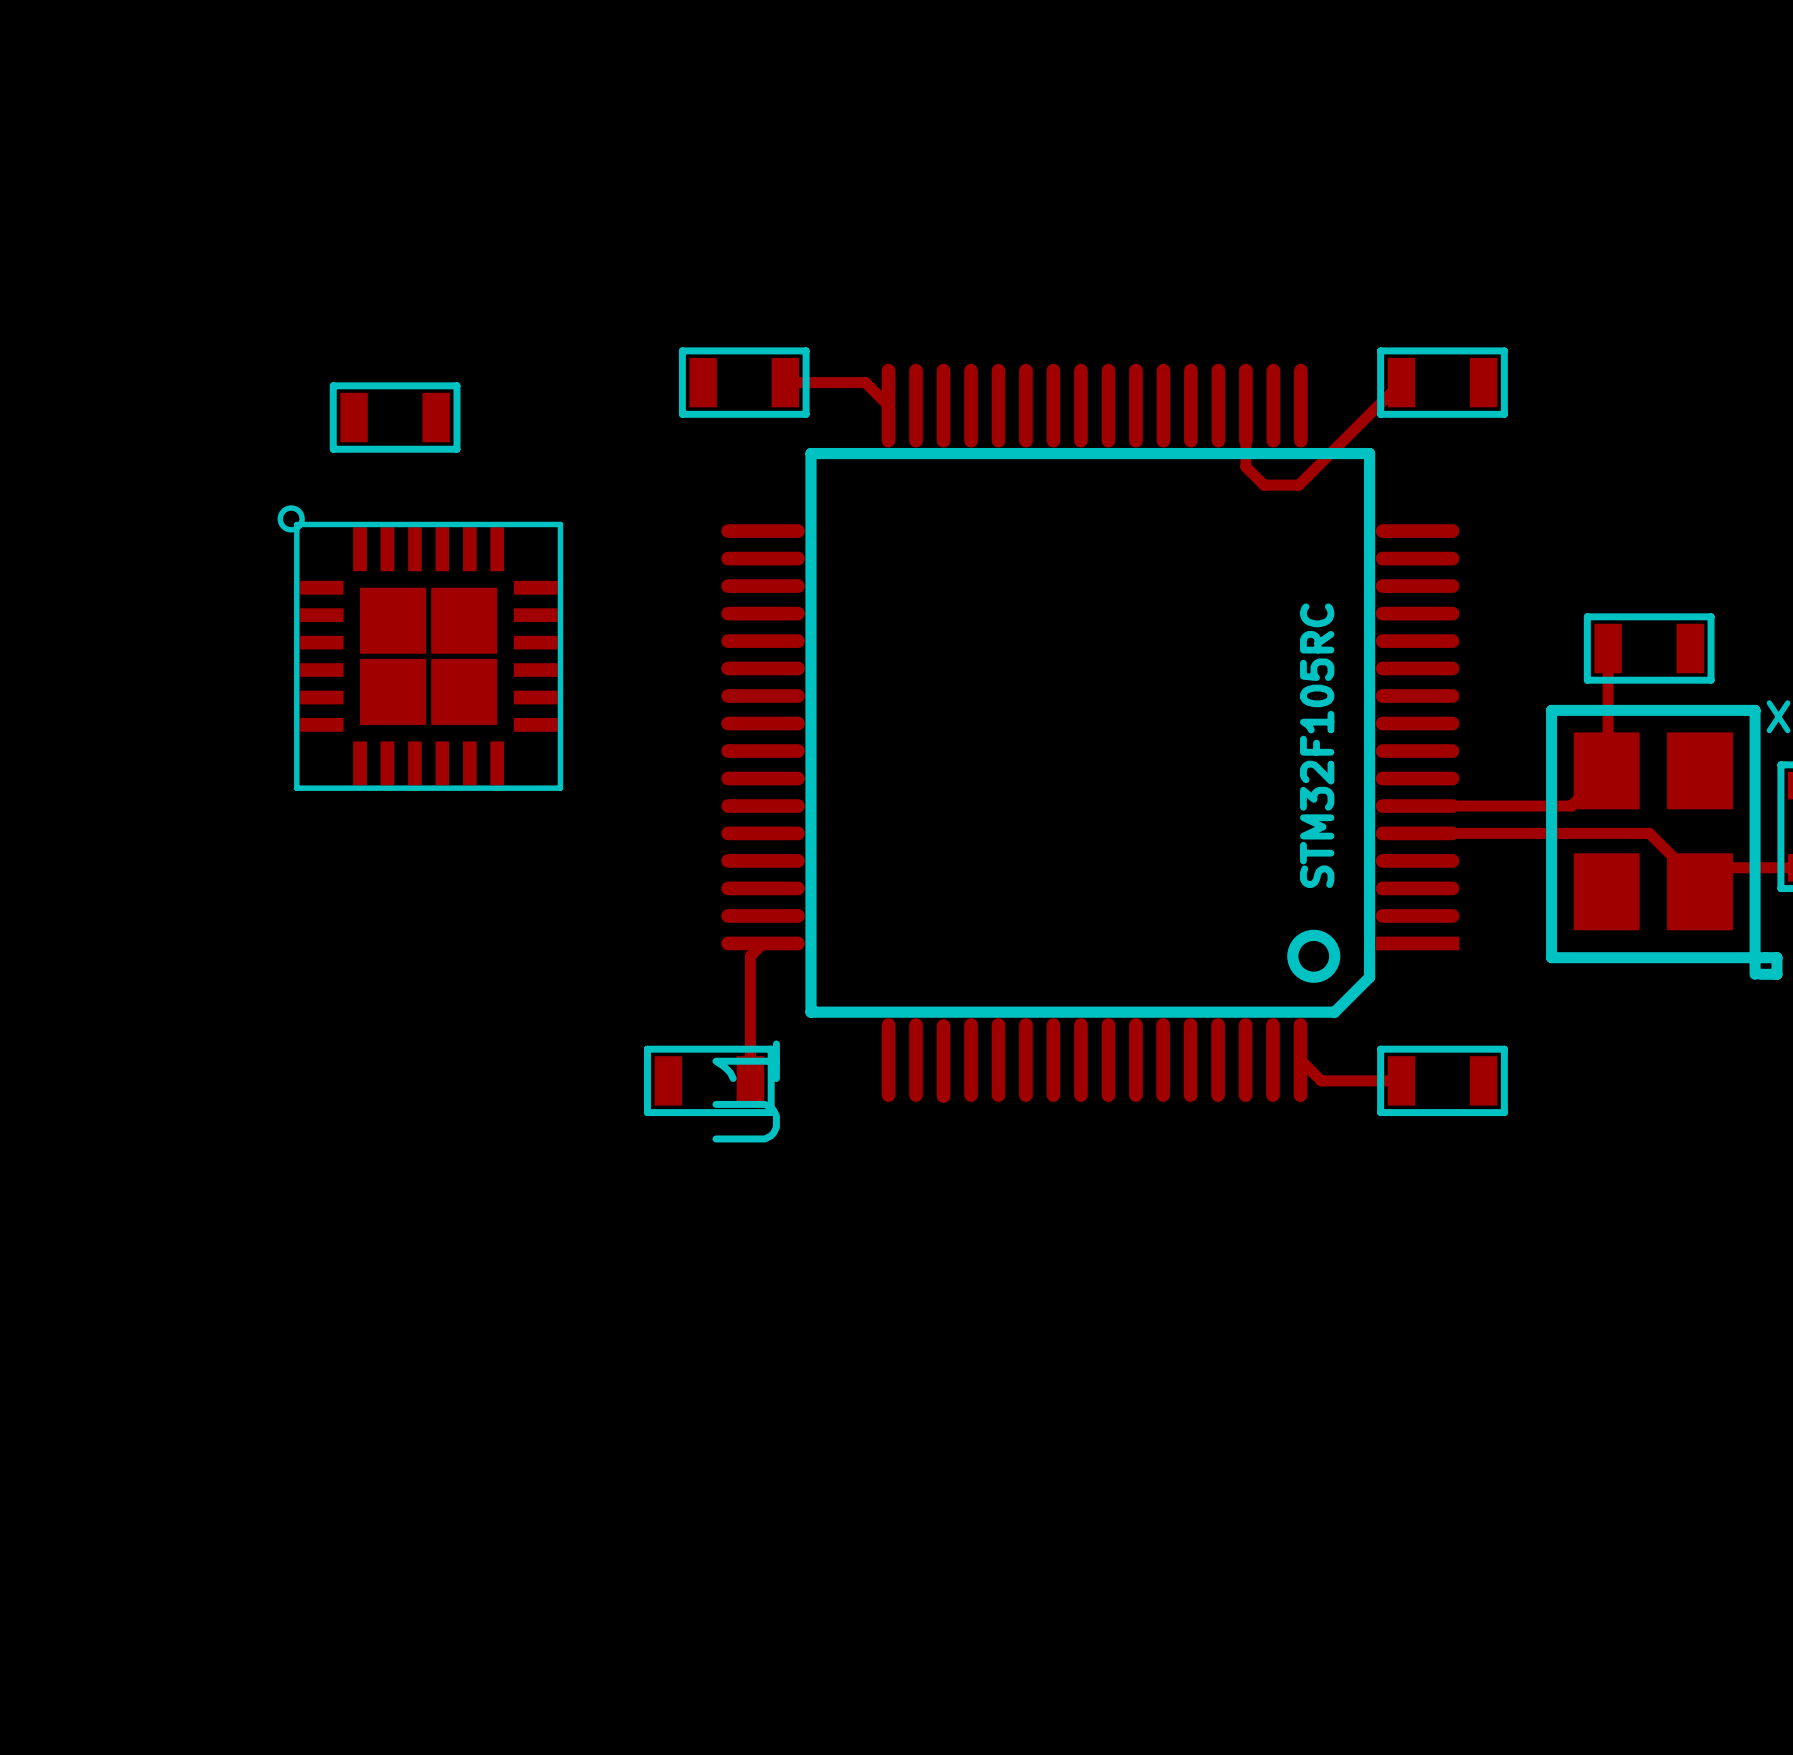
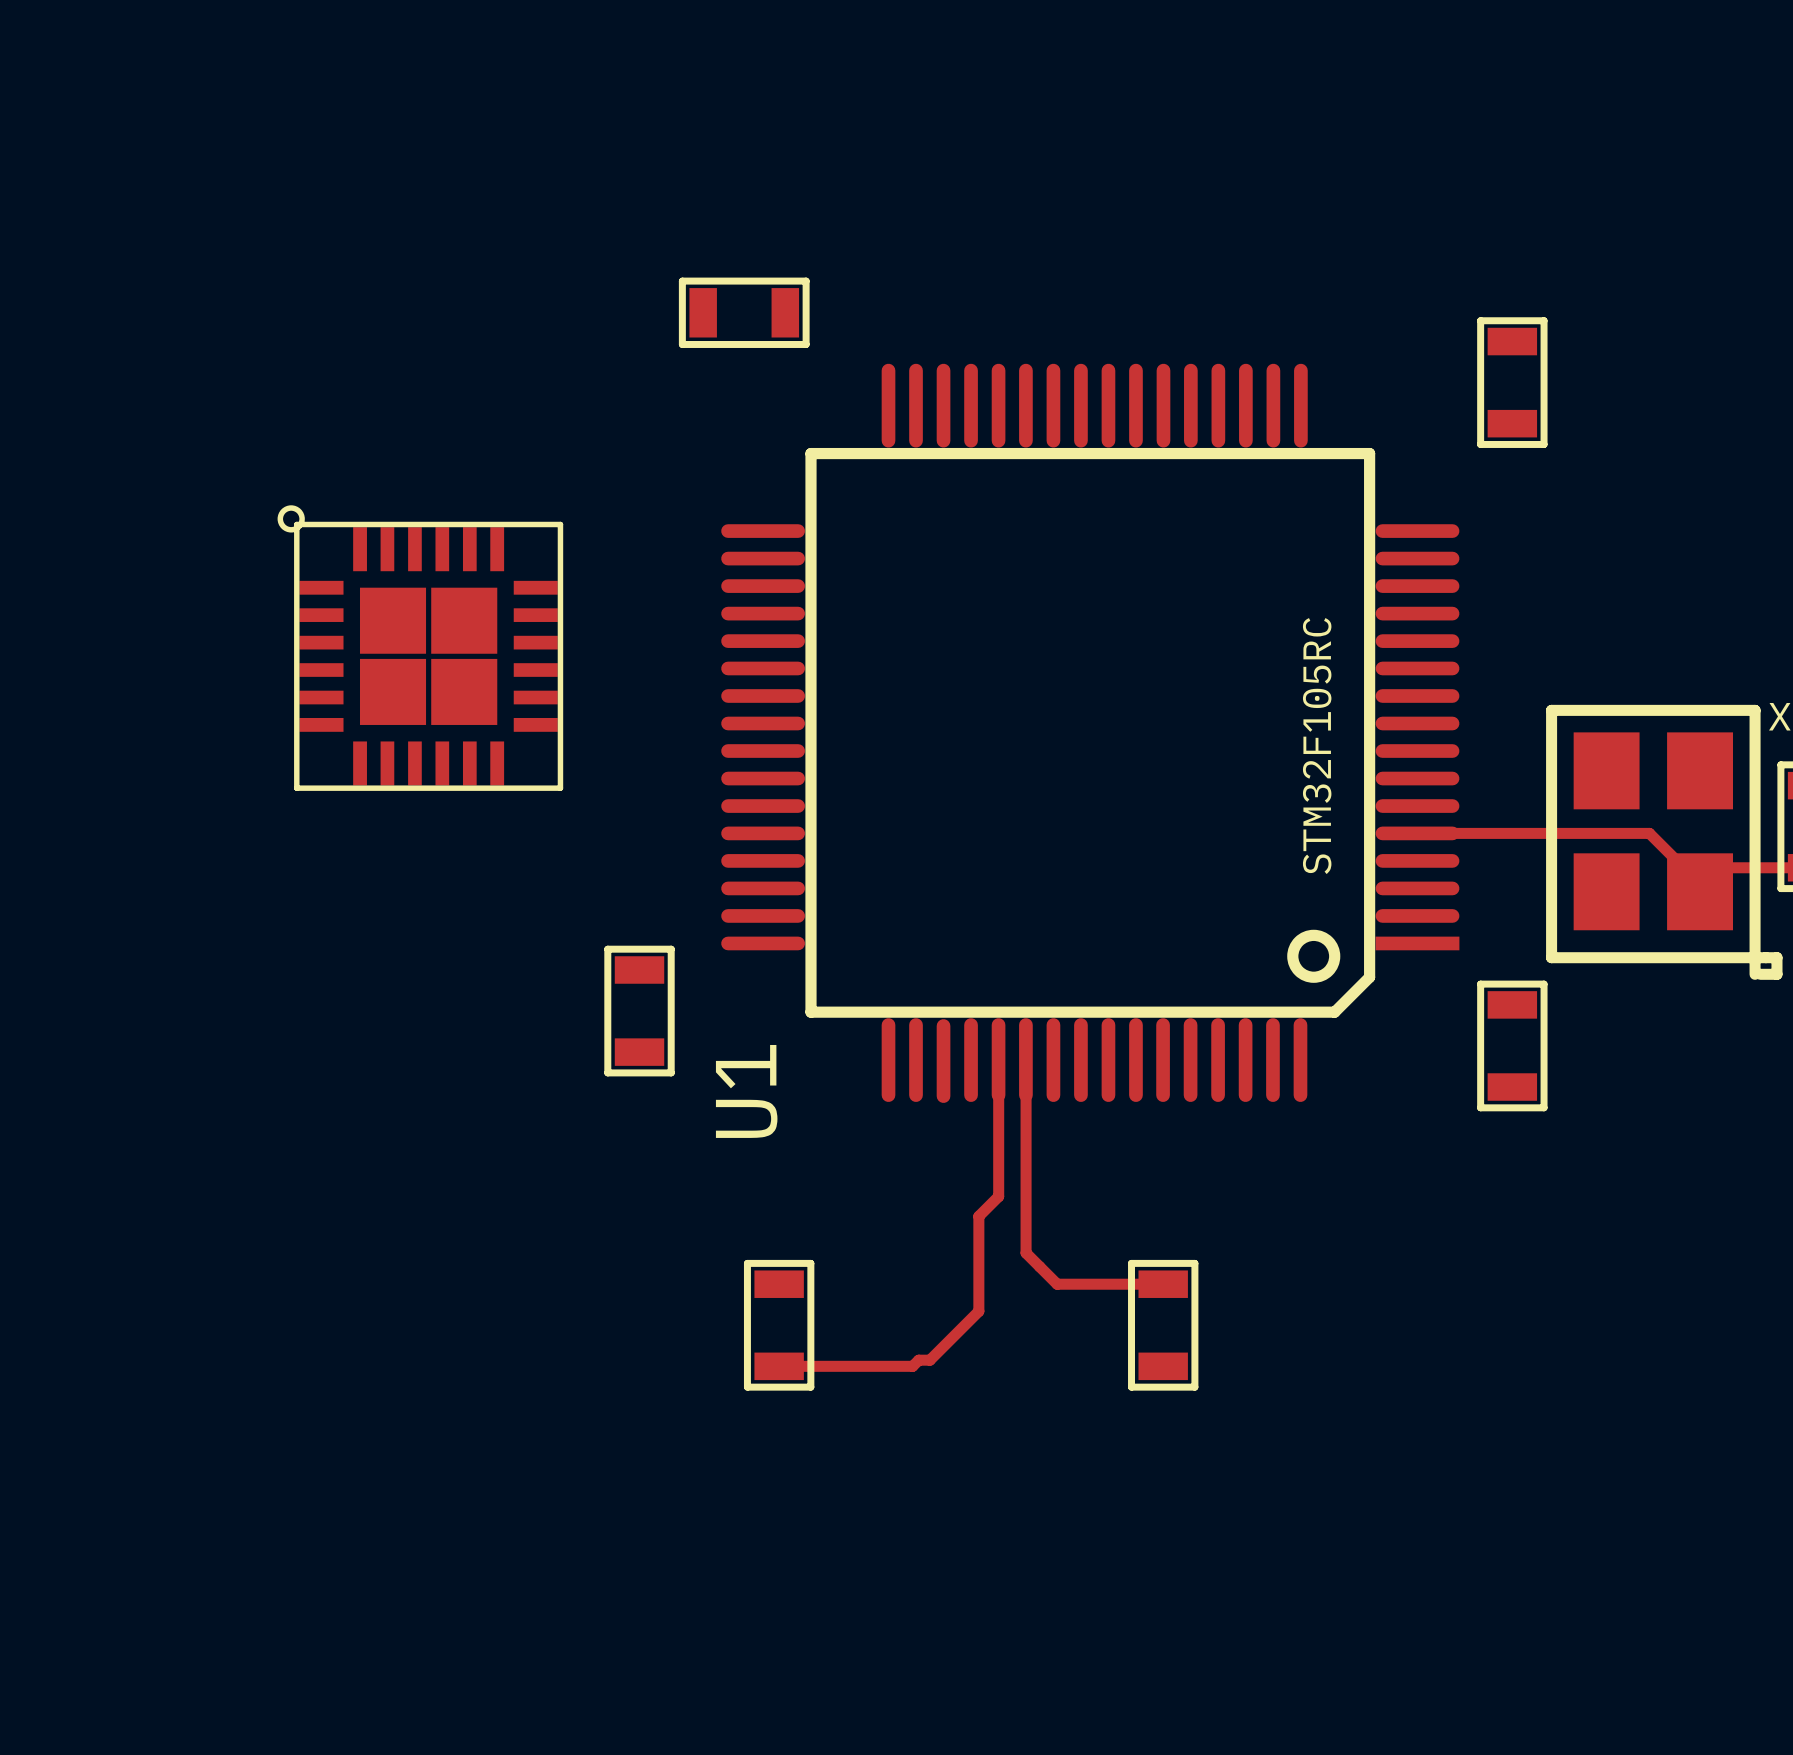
part position: (744, 382) -> (744, 312)
top track: (785, 382) (865, 382) (888, 405) -> none
top track: (1401, 382) (1298, 485) (1264, 485) (1245, 466) (1245, 405) -> none
part rotation: 0° (1442, 382) -> 90° clockwise (1512, 382)
part: (395, 417) -> none
top track: (1608, 648) (1608, 769) (1571, 806) (1417, 806) -> none
part: (1649, 648) -> none
top track: (763, 943) (750, 956) (750, 1080) -> none
top track: none -> (998, 1060) (998, 1196) (978, 1216) (978, 1311) (929, 1360) (918, 1360) (912, 1366) (779, 1366)
top track: none -> (1026, 1060) (1026, 1253) (1057, 1284) (1163, 1284)
top track: (1300, 1060) (1321, 1080) (1401, 1080) -> none
part rotation: 0° (709, 1080) -> 90° clockwise (639, 1011)
part position: (709, 1080) -> (639, 1011)
part rotation: 0° (1442, 1080) -> 90° clockwise (1512, 1045)
part: none -> (779, 1325)
part: none -> (1163, 1325)

